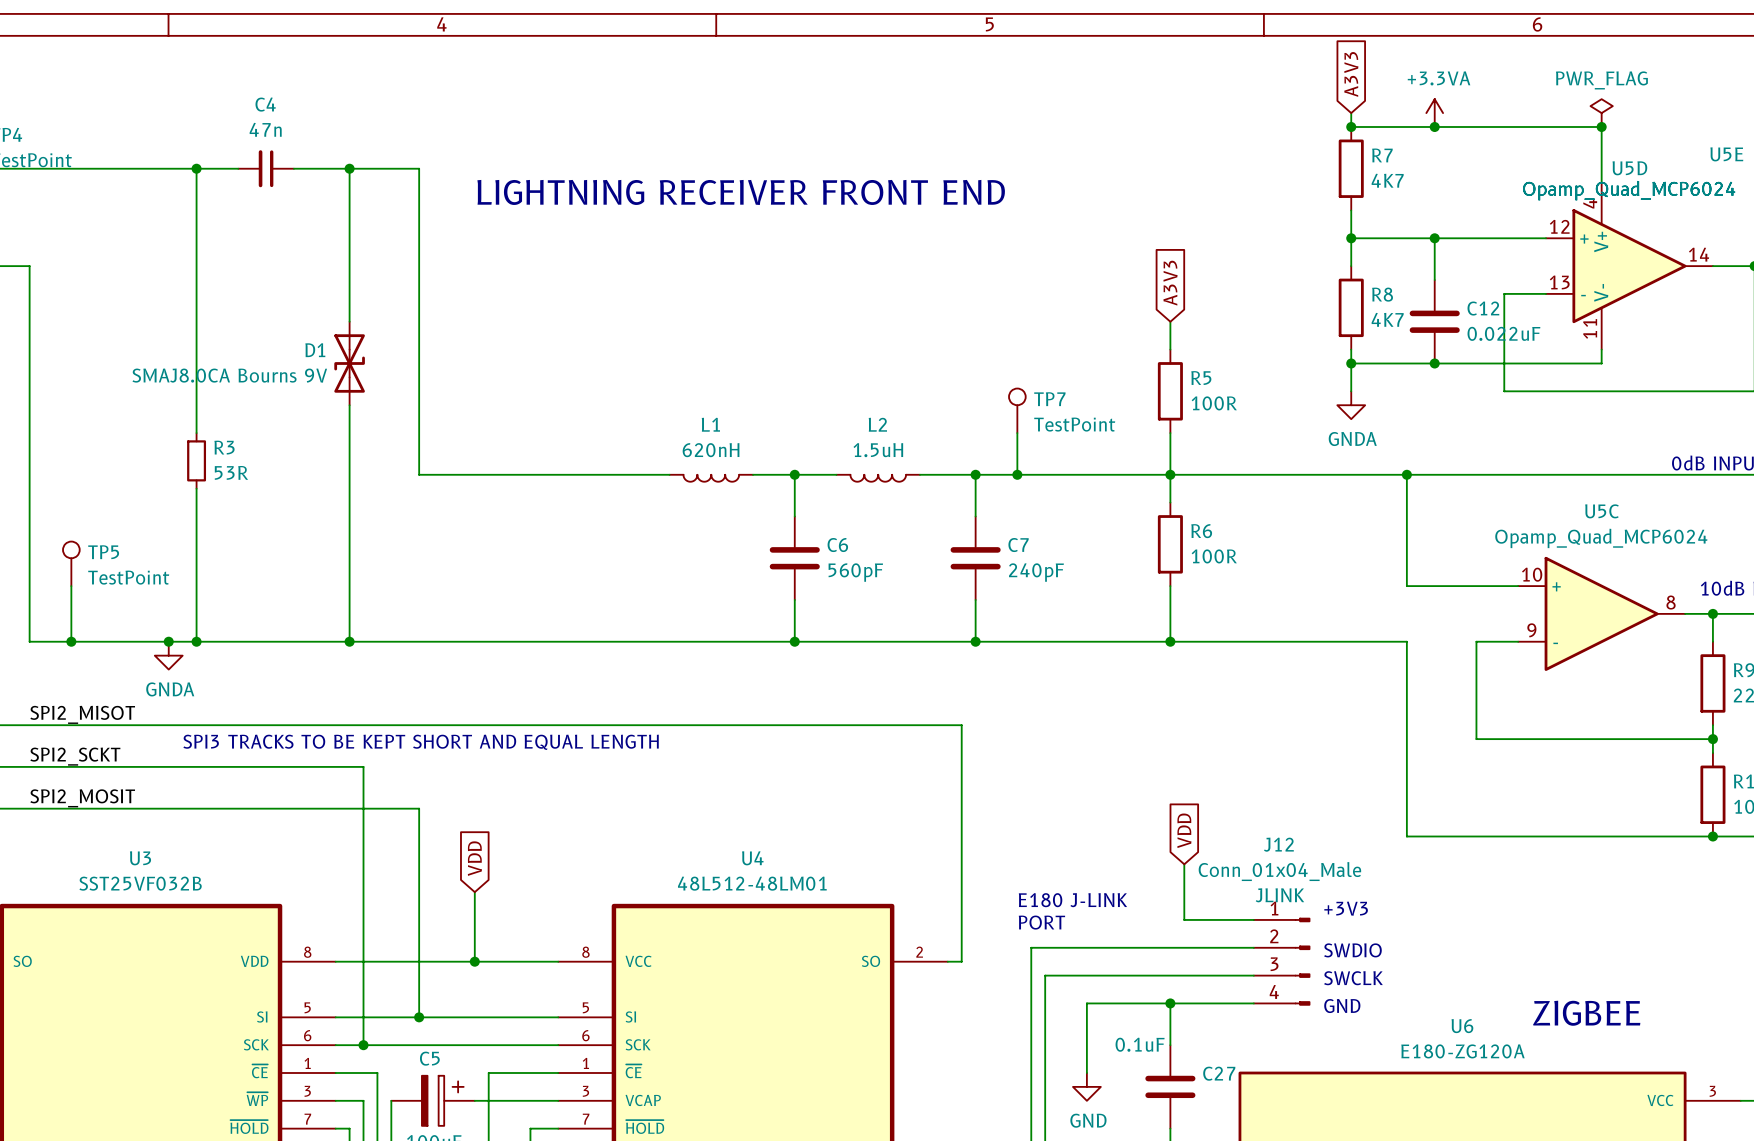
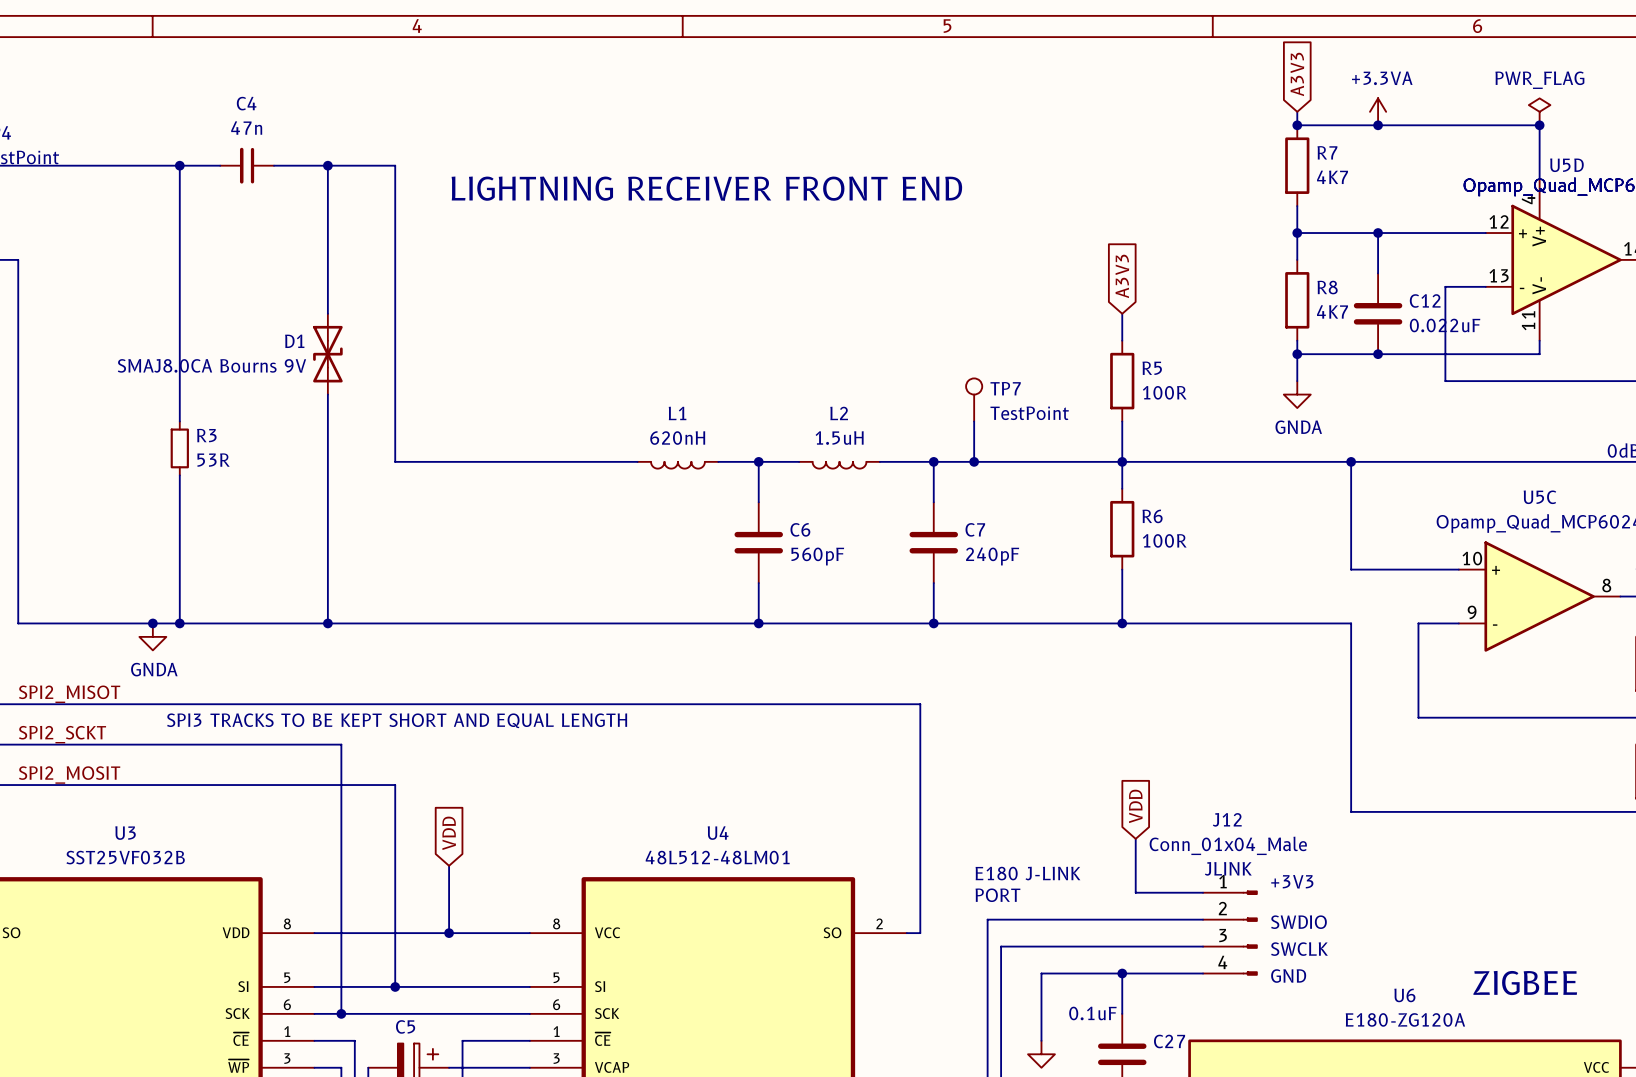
TP5: TestPoint (71, 563) -> none
wire: (71, 586) (71, 641) -> none
junction: (71, 641) -> none

